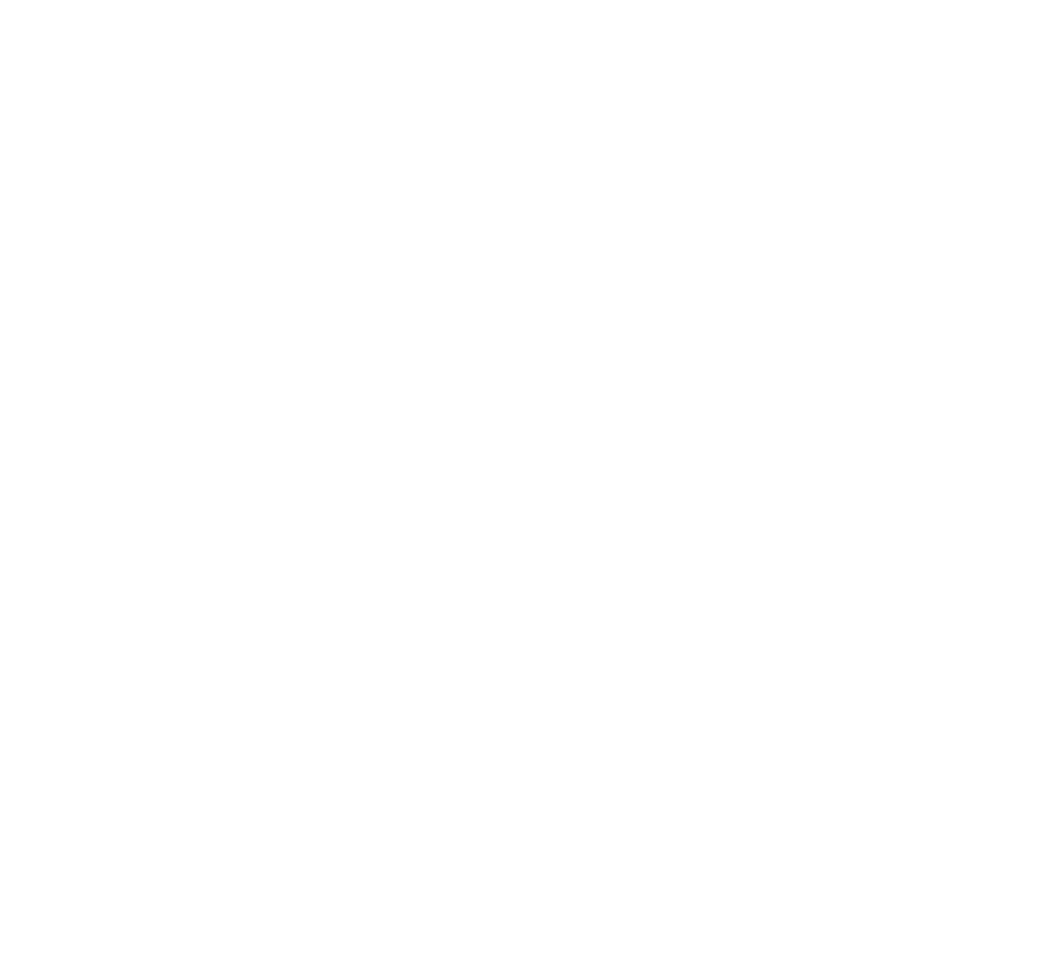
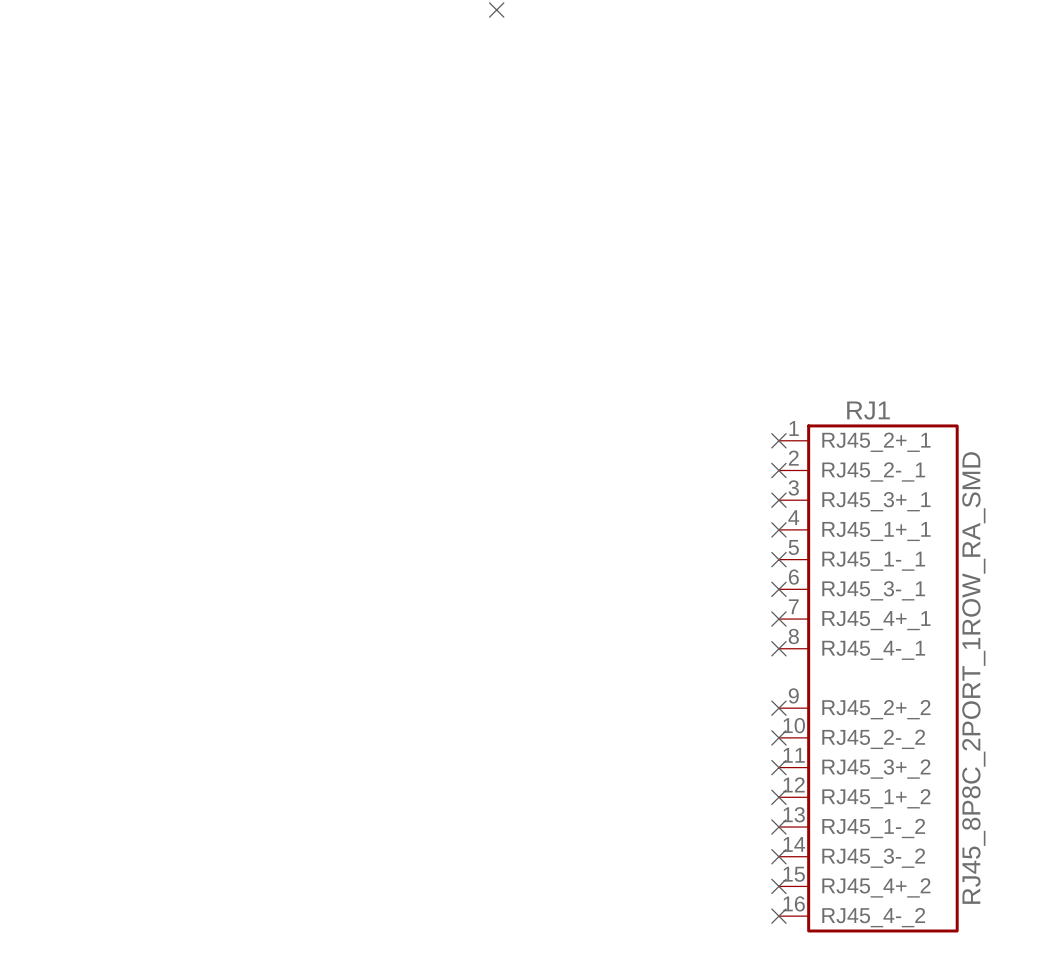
no-connect mark: none -> (496, 9)
no-connect mark: none -> (778, 440)
no-connect mark: none -> (778, 470)
no-connect mark: none -> (778, 500)
no-connect mark: none -> (778, 529)
no-connect mark: none -> (778, 559)
no-connect mark: none -> (778, 589)
no-connect mark: none -> (778, 619)
no-connect mark: none -> (778, 648)
RJ1: none -> RJ45_8P8C_2PORT_1ROW_RA_SMD (868, 678)
no-connect mark: none -> (778, 708)
no-connect mark: none -> (778, 737)
no-connect mark: none -> (778, 767)
no-connect mark: none -> (778, 797)
no-connect mark: none -> (778, 827)
no-connect mark: none -> (778, 856)
no-connect mark: none -> (778, 886)
no-connect mark: none -> (778, 916)

